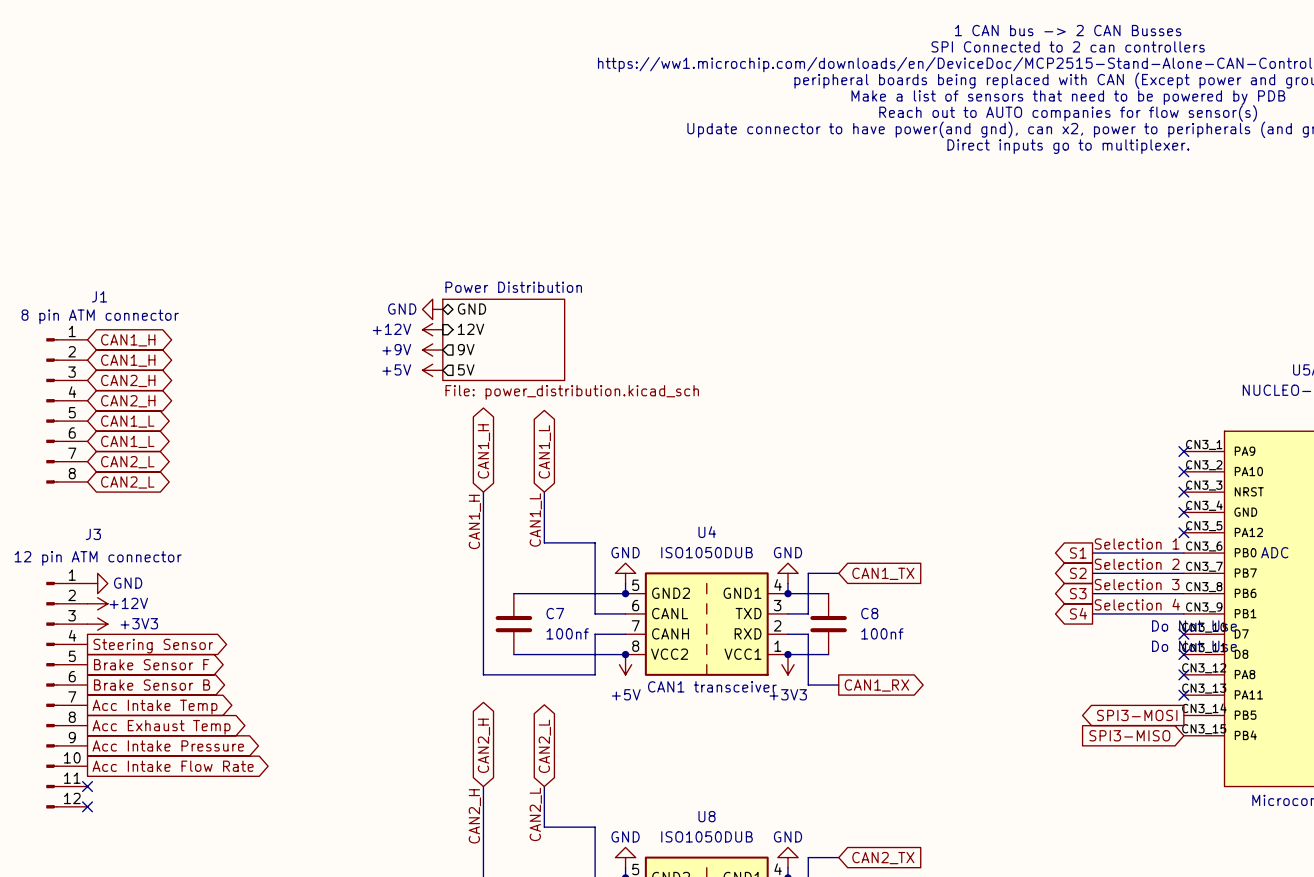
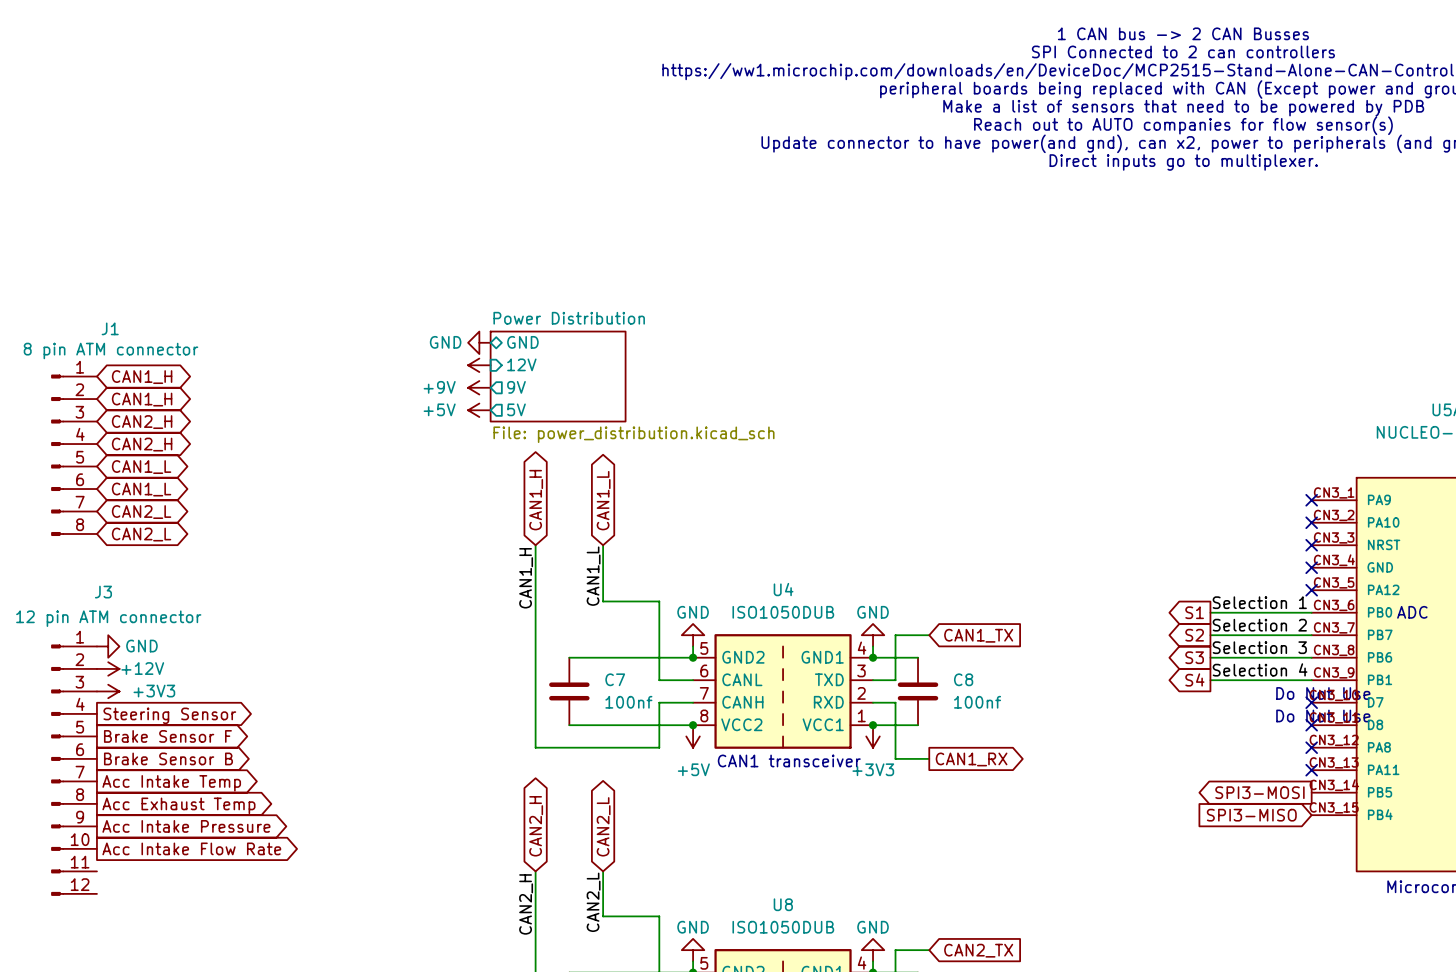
power symbol text: +12V (391, 329) -> none
no-connect mark: (87, 786) -> none
no-connect mark: (87, 806) -> none

